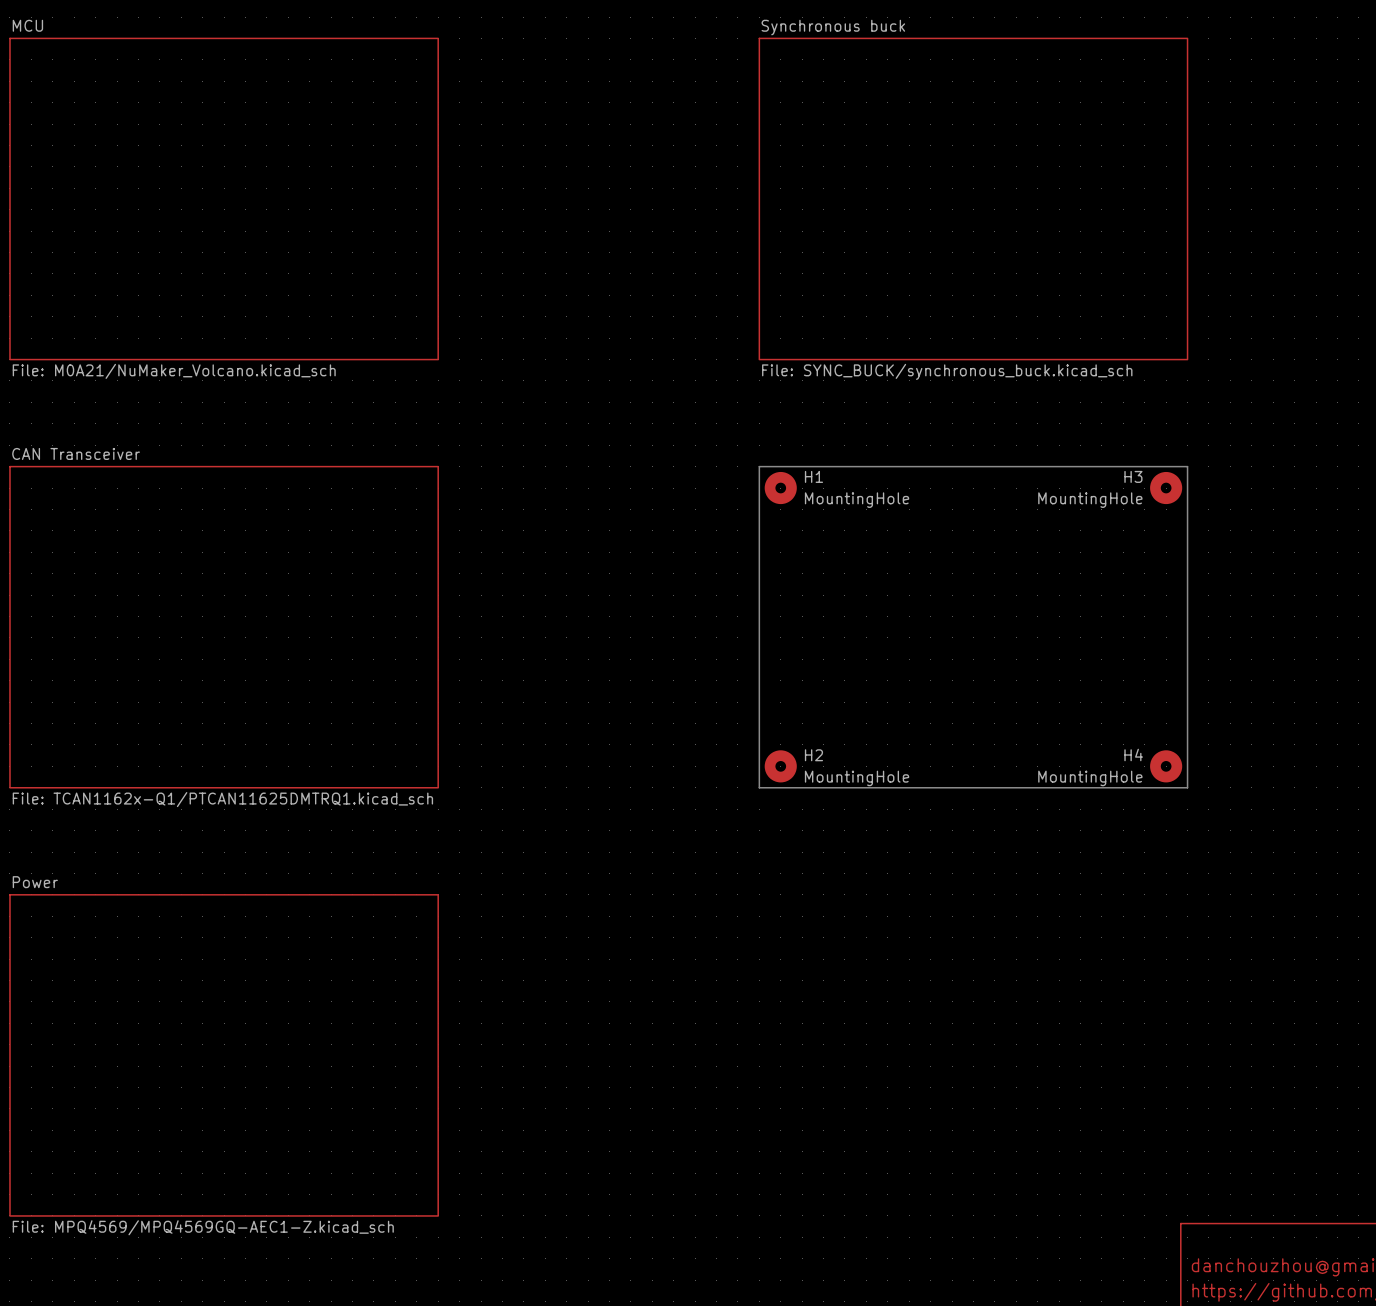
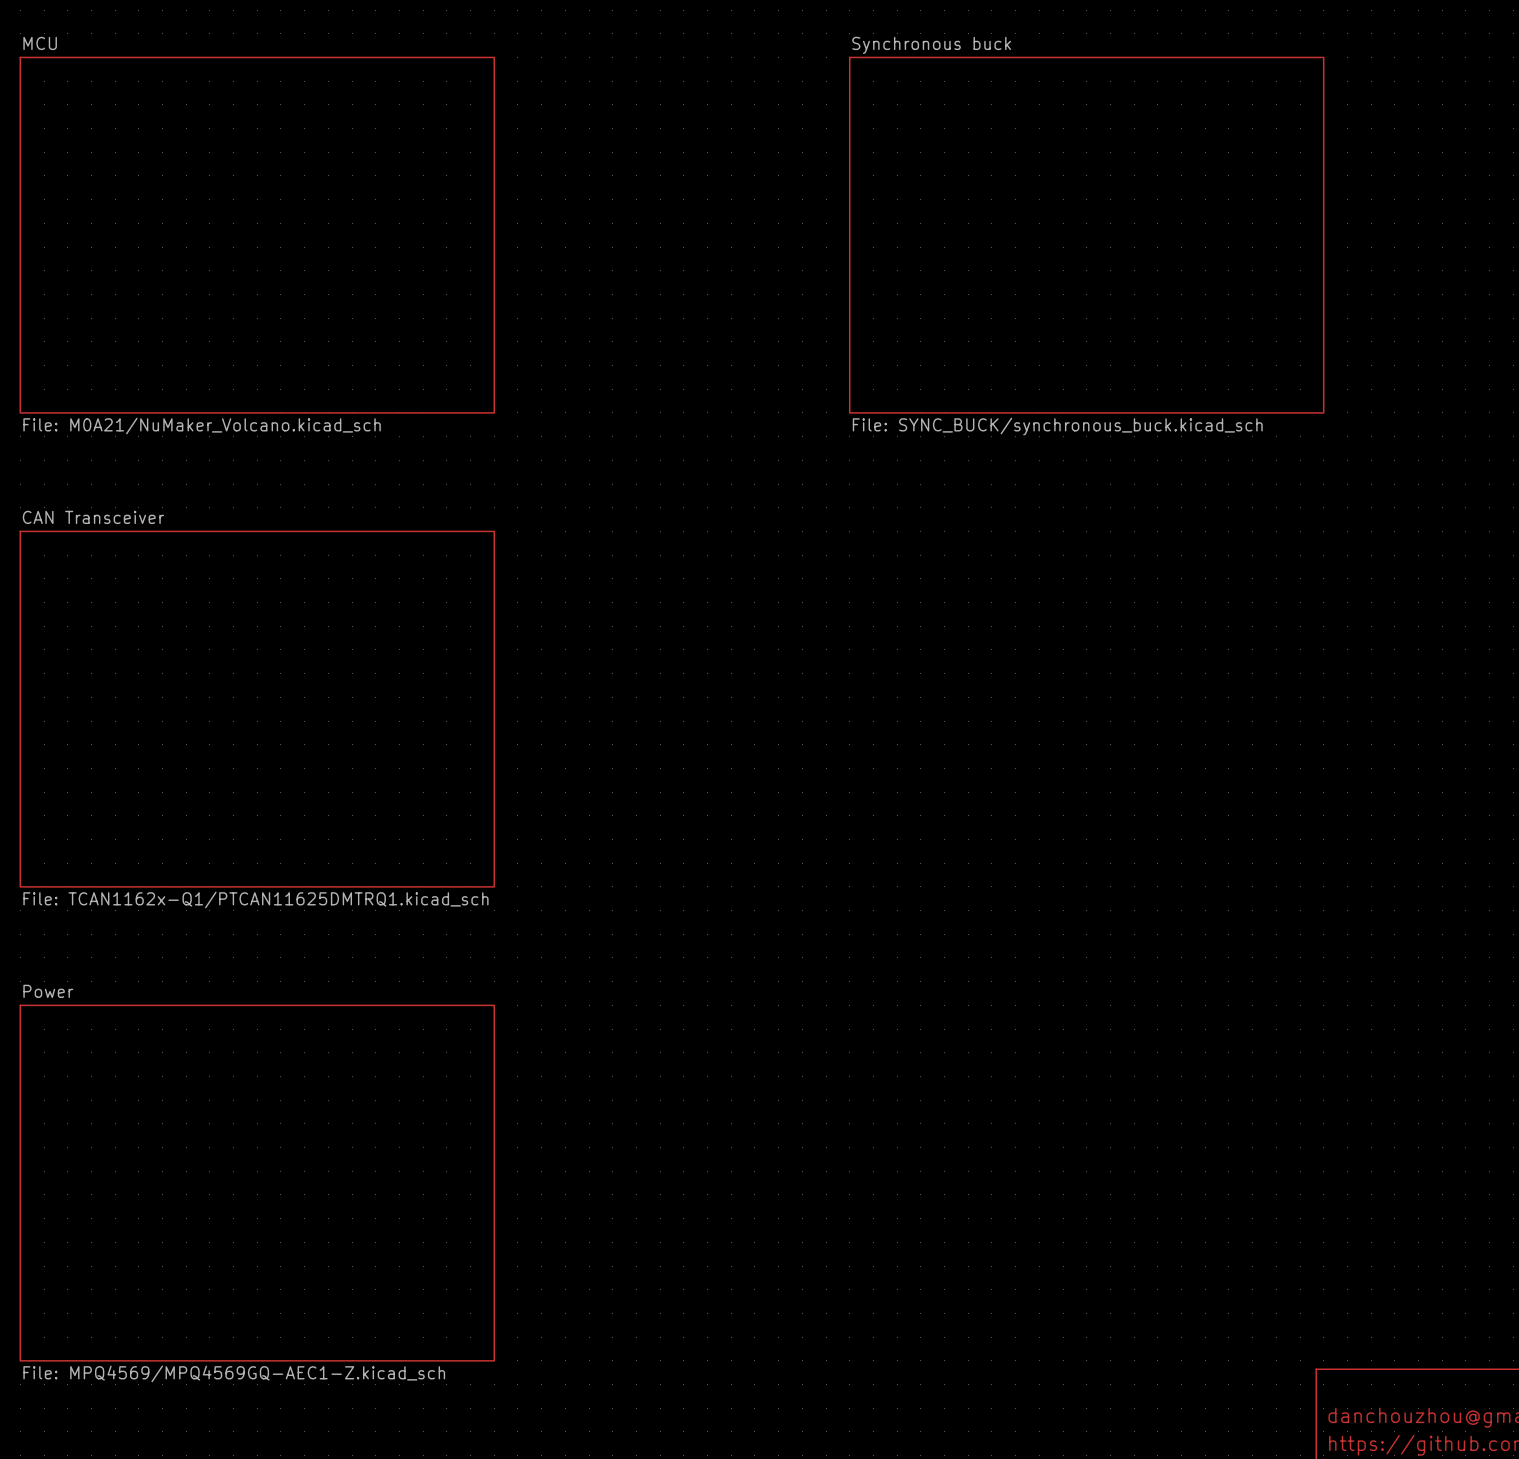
line: (759, 466) (759, 787) (1187, 787) (1187, 466) (759, 466) -> none
H1: MountingHole (780, 488) -> none
H3: MountingHole (1166, 488) -> none
H2: MountingHole (780, 766) -> none
H4: MountingHole (1166, 766) -> none

